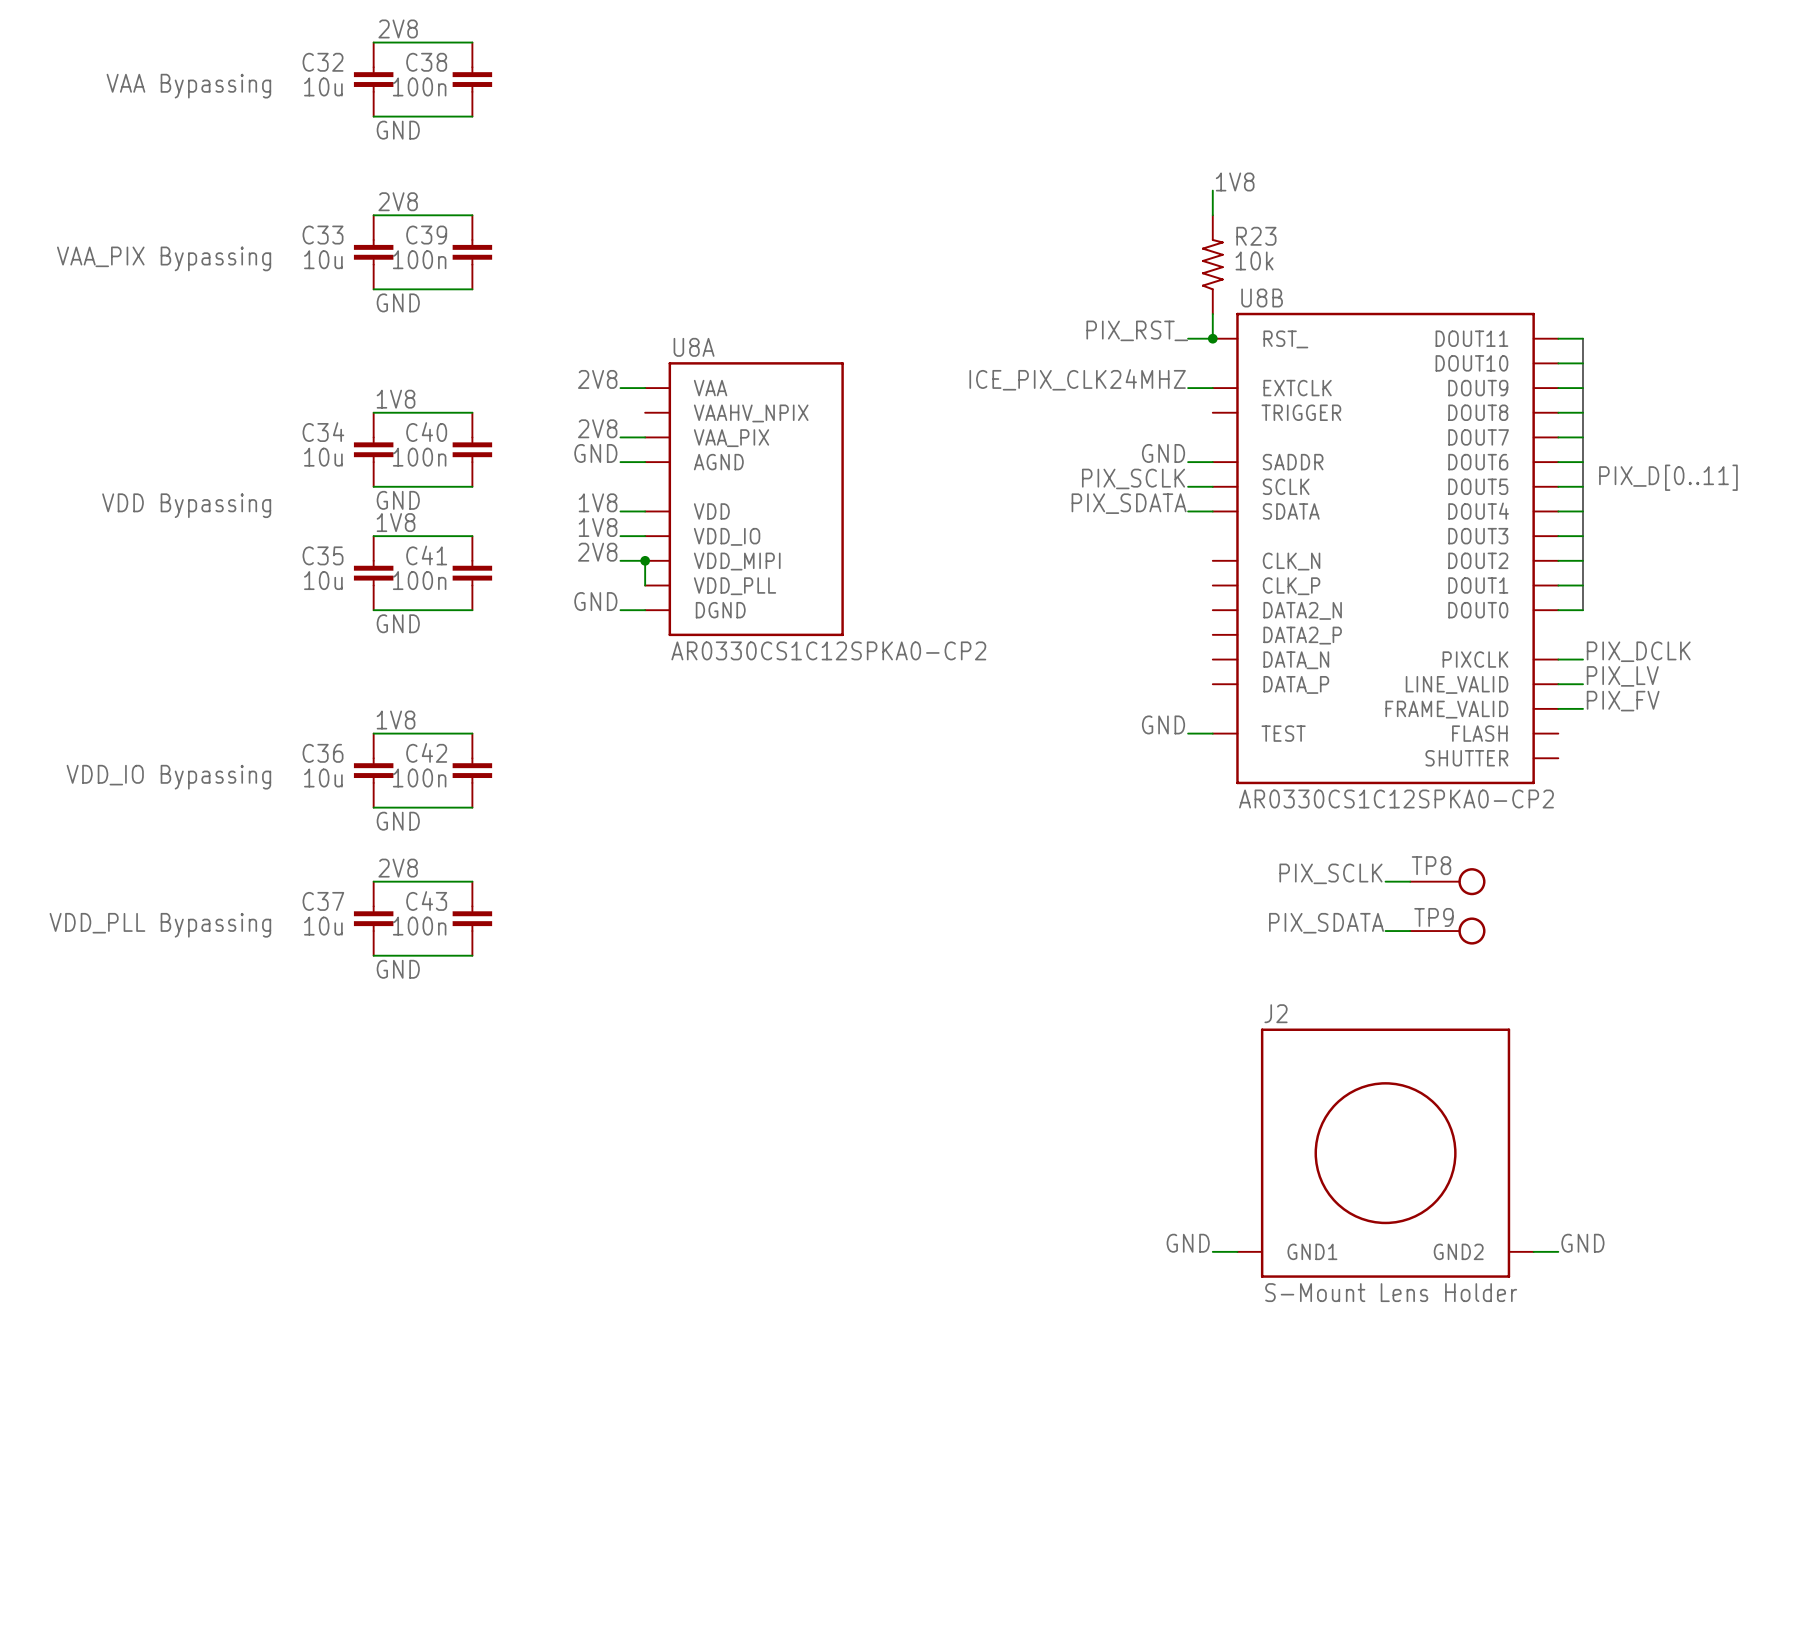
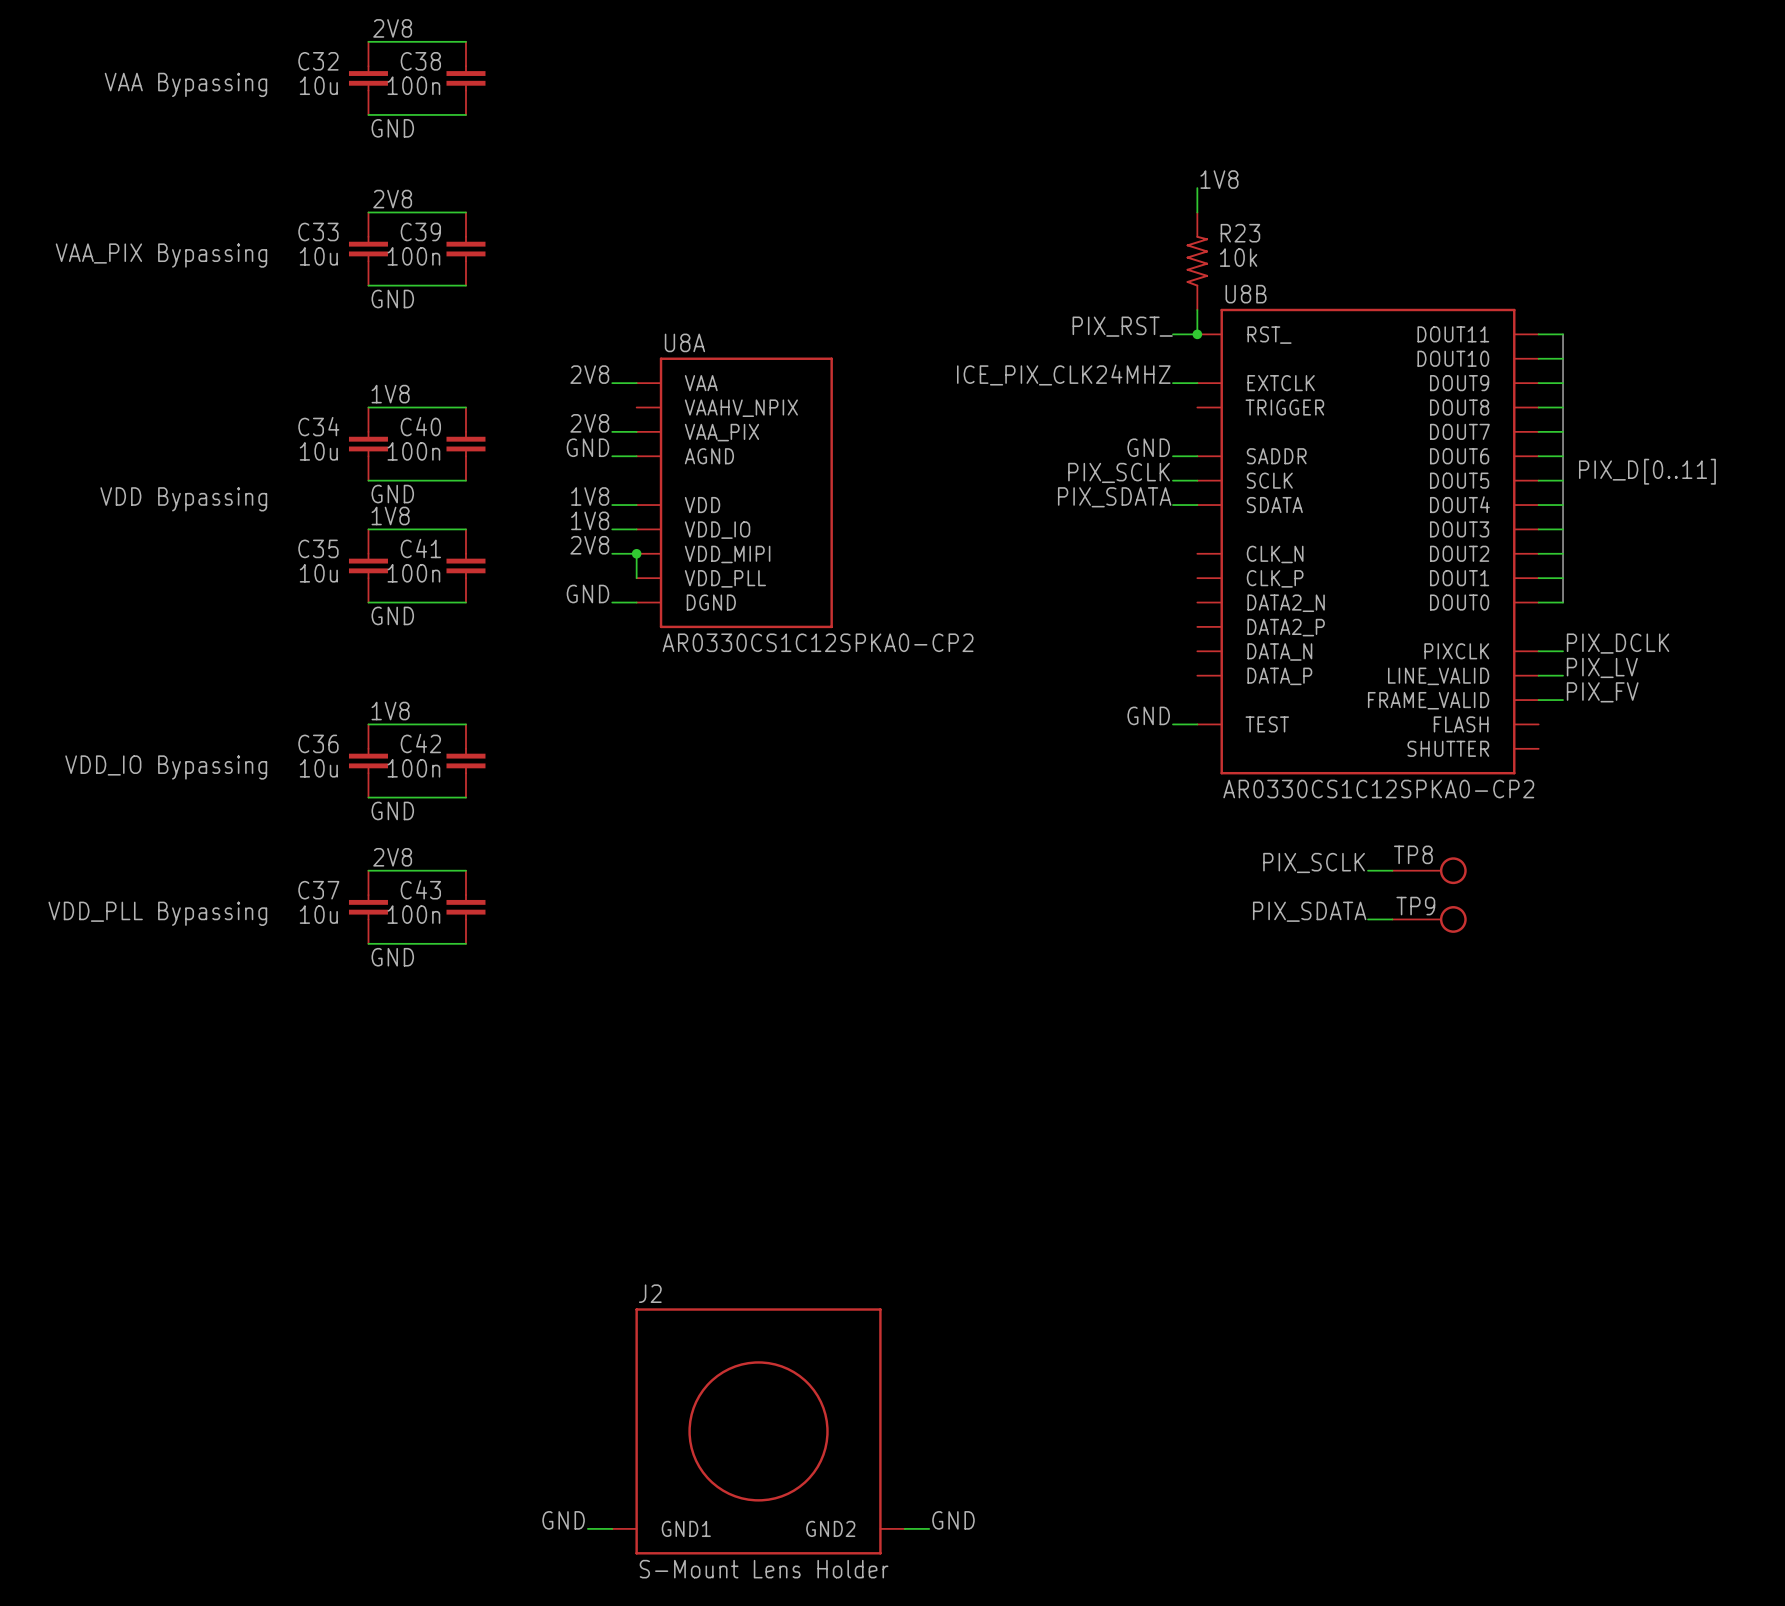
J2 position: (1385, 1153) -> (758, 1431)
label: GND (1188, 1243) -> none
label: GND (1582, 1243) -> none
wire: (1212, 1251) (1237, 1251) -> none
wire: (1533, 1251) (1558, 1251) -> none
label: none -> GND (563, 1520)
label: none -> GND (953, 1520)
wire: none -> (587, 1528) (612, 1528)
wire: none -> (904, 1528) (929, 1528)

